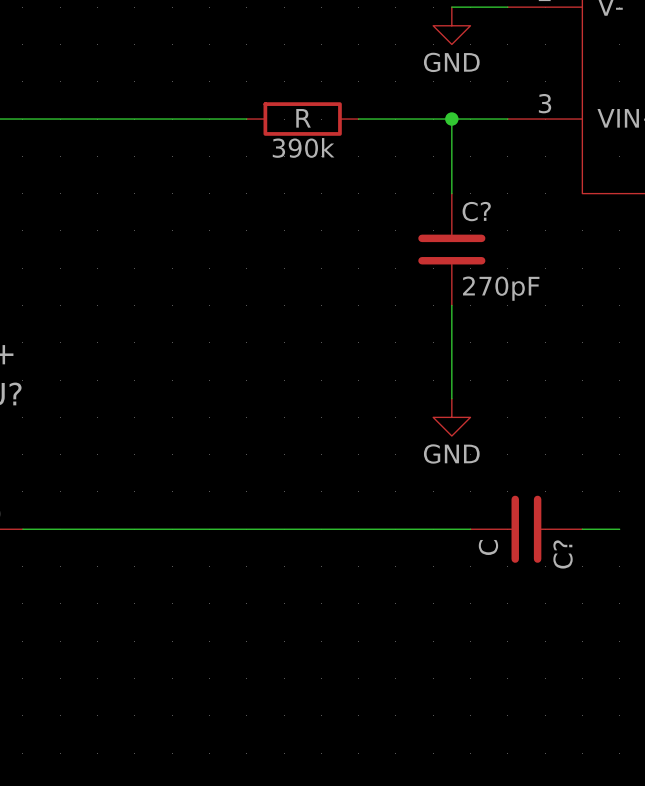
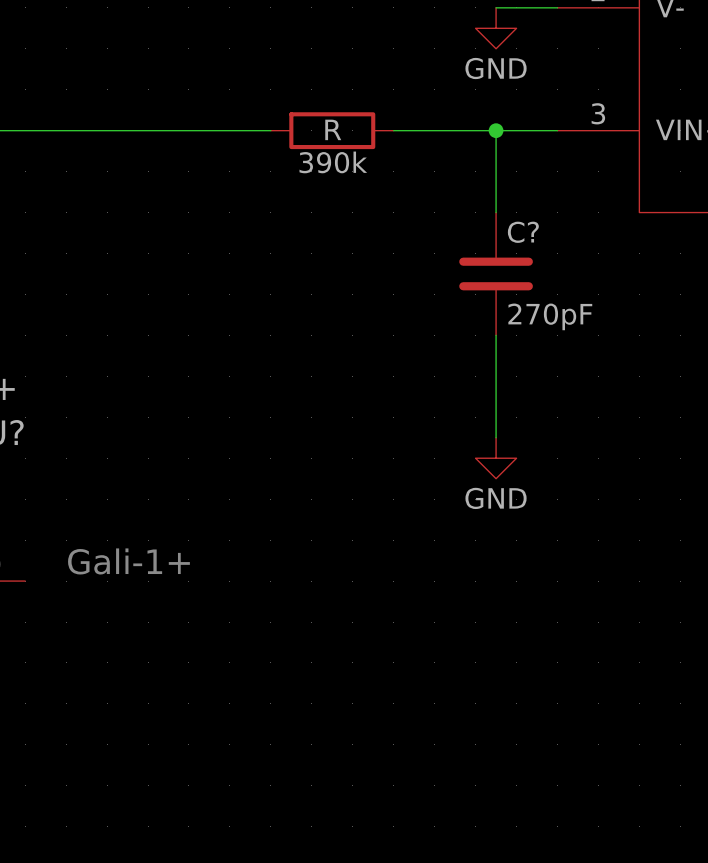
text: none -> Gali-1+ (128, 561)
wire: (22, 529) (470, 529) -> none
C?: C (526, 529) -> none
wire: (582, 529) (619, 529) -> none

